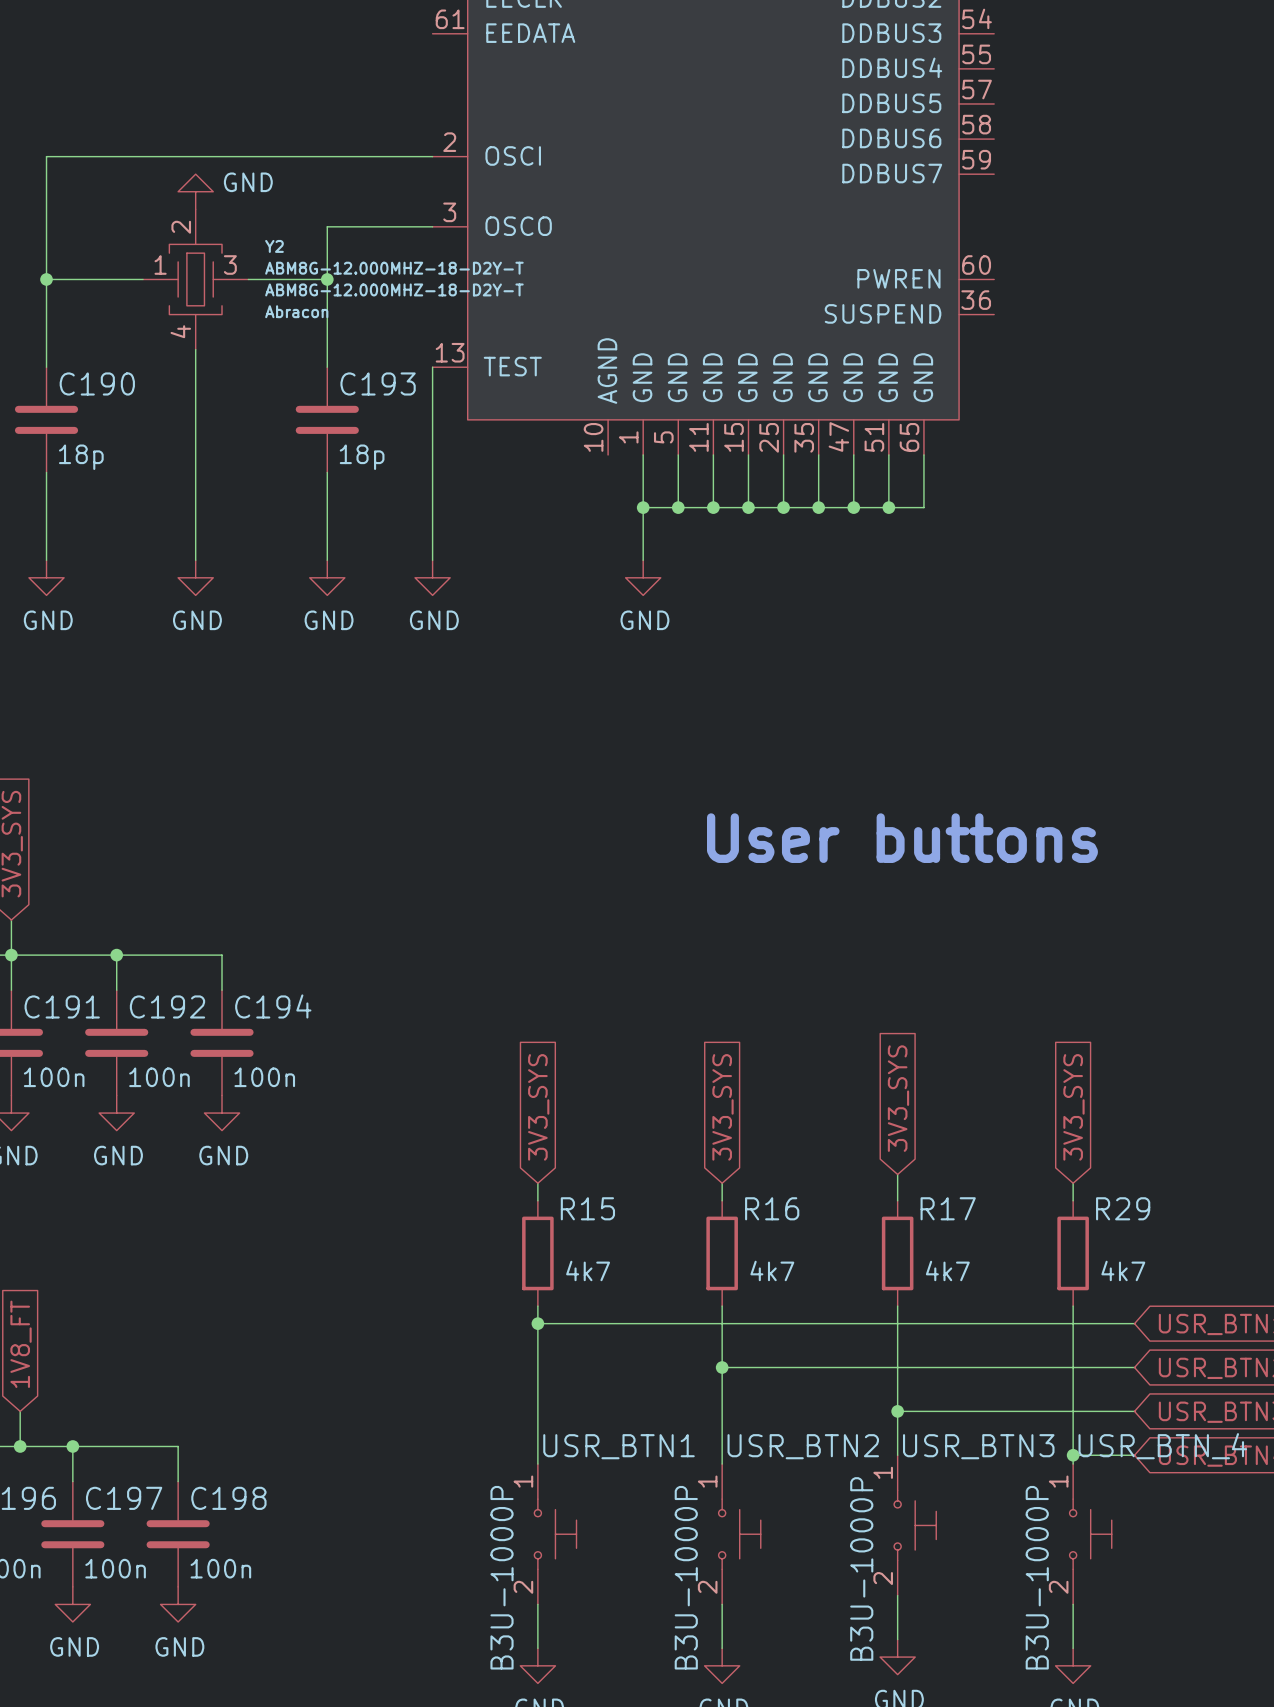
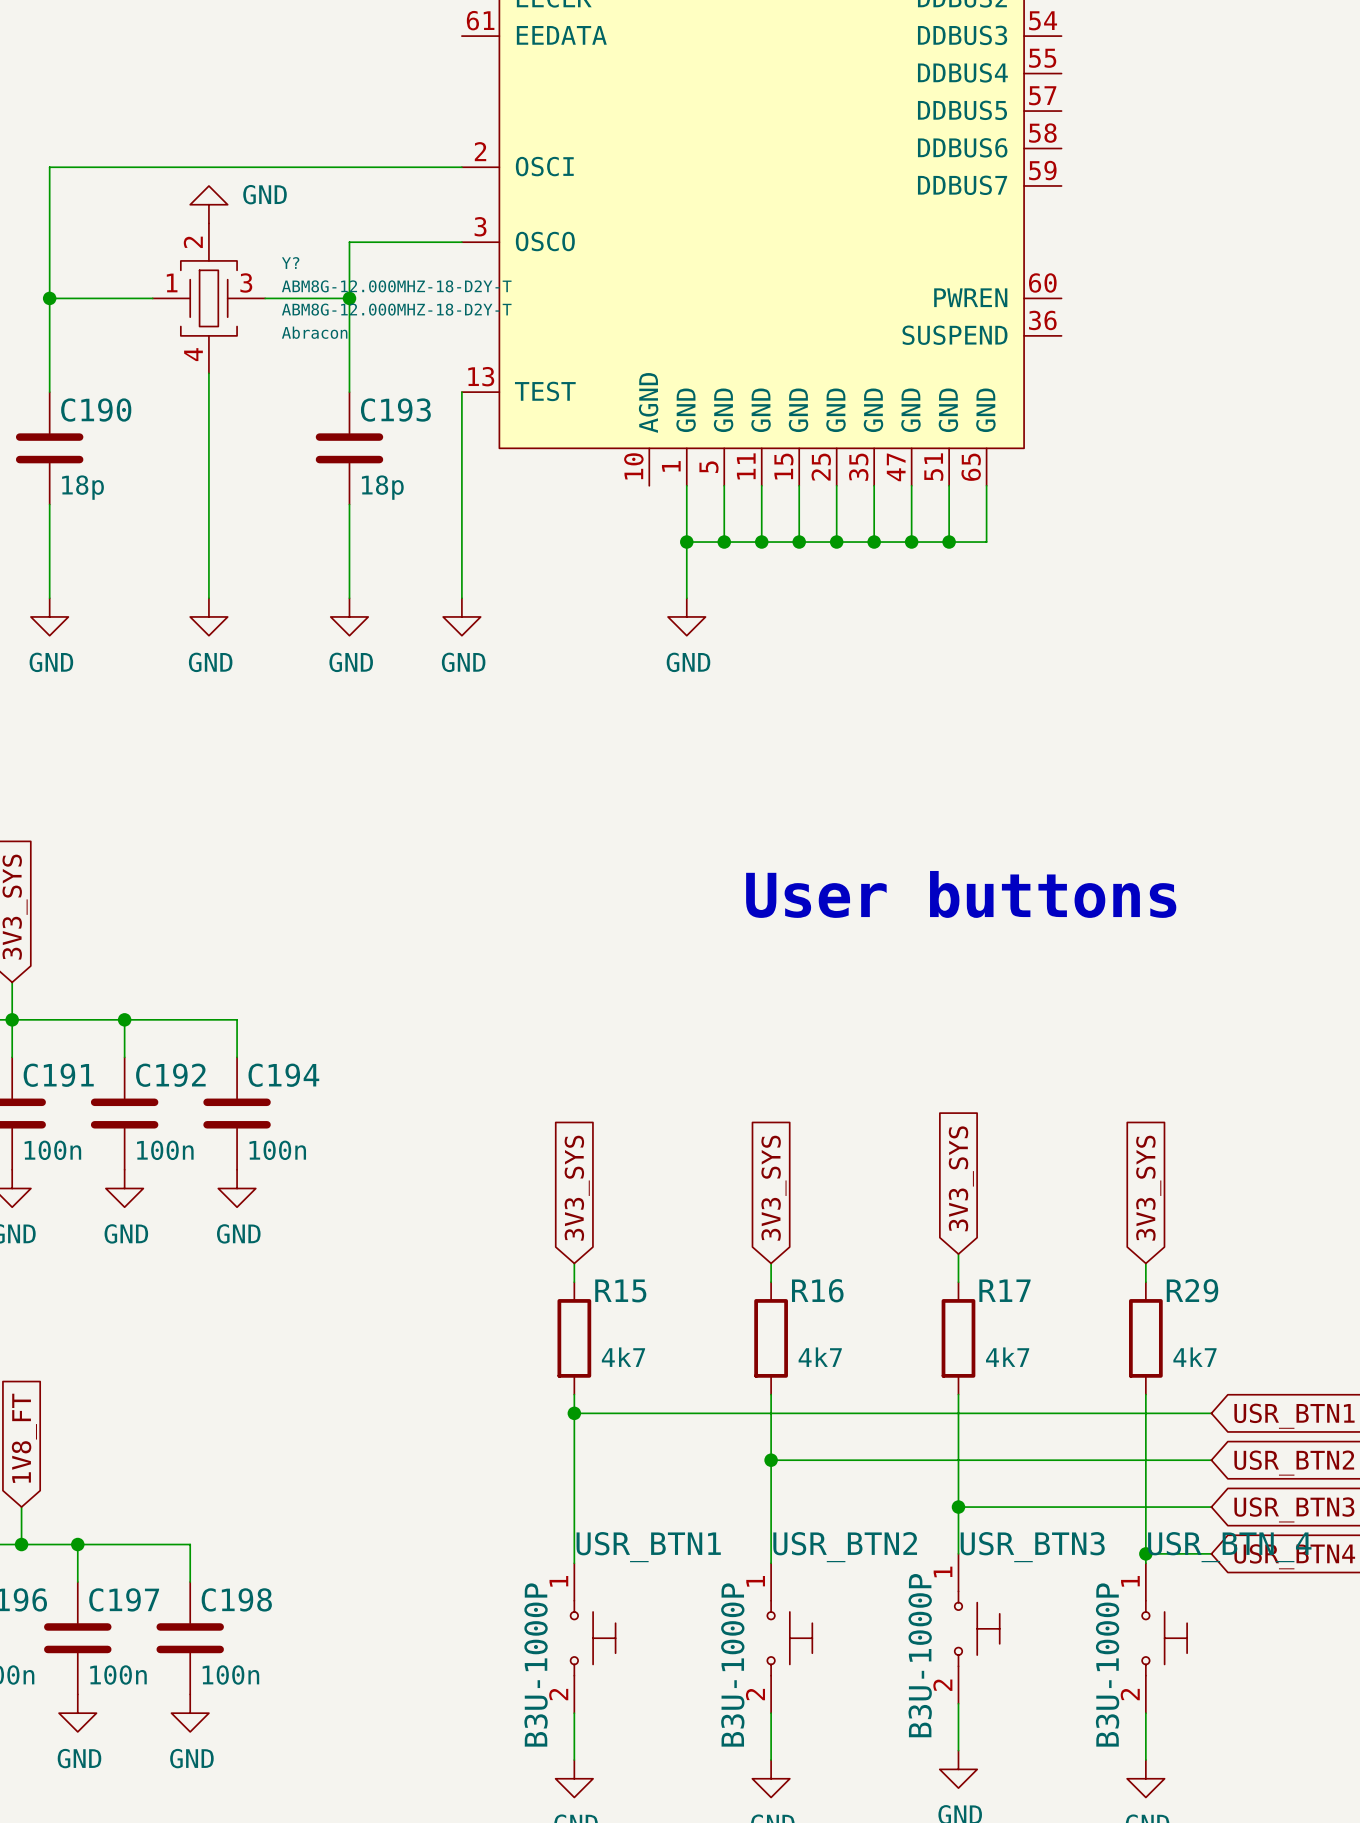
Y2 name: Y2 (274, 246) -> Y? (290, 263)

